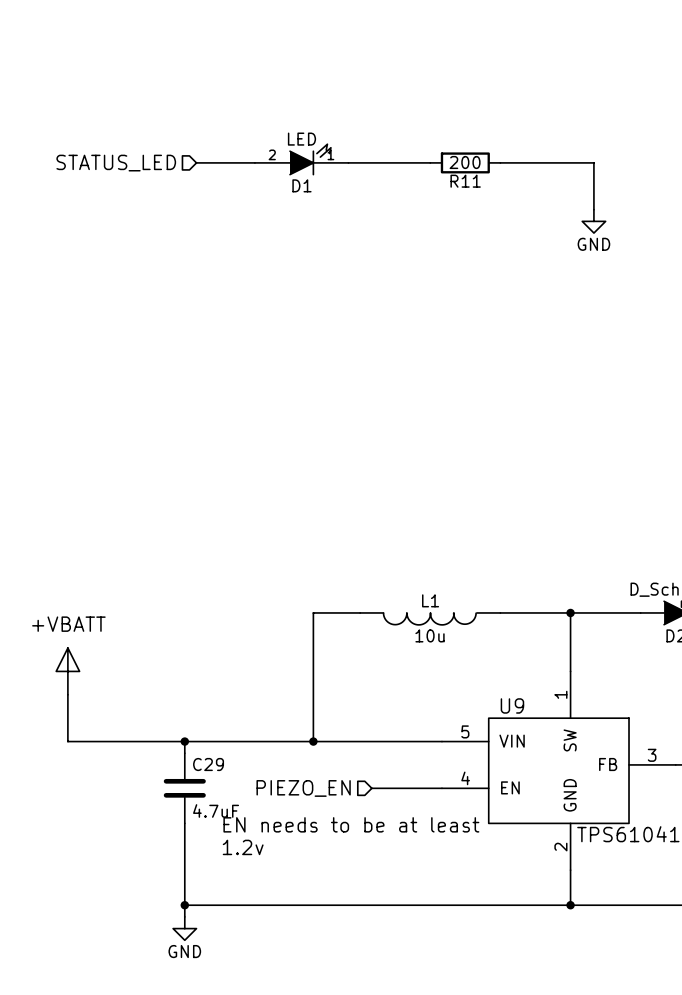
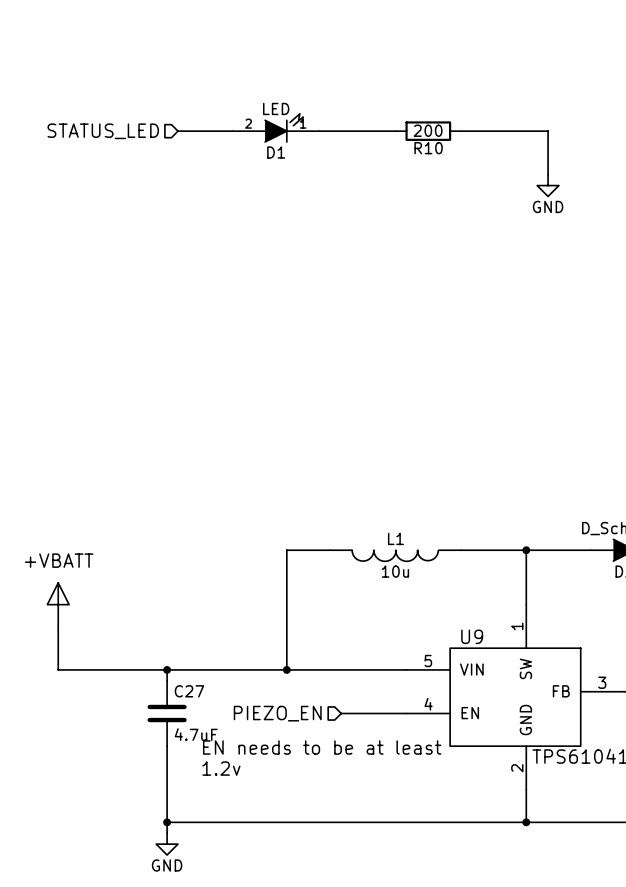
R11 name: R11 (465, 181) -> R10 (428, 148)
C29 name: C29 (208, 764) -> C27 (189, 691)

